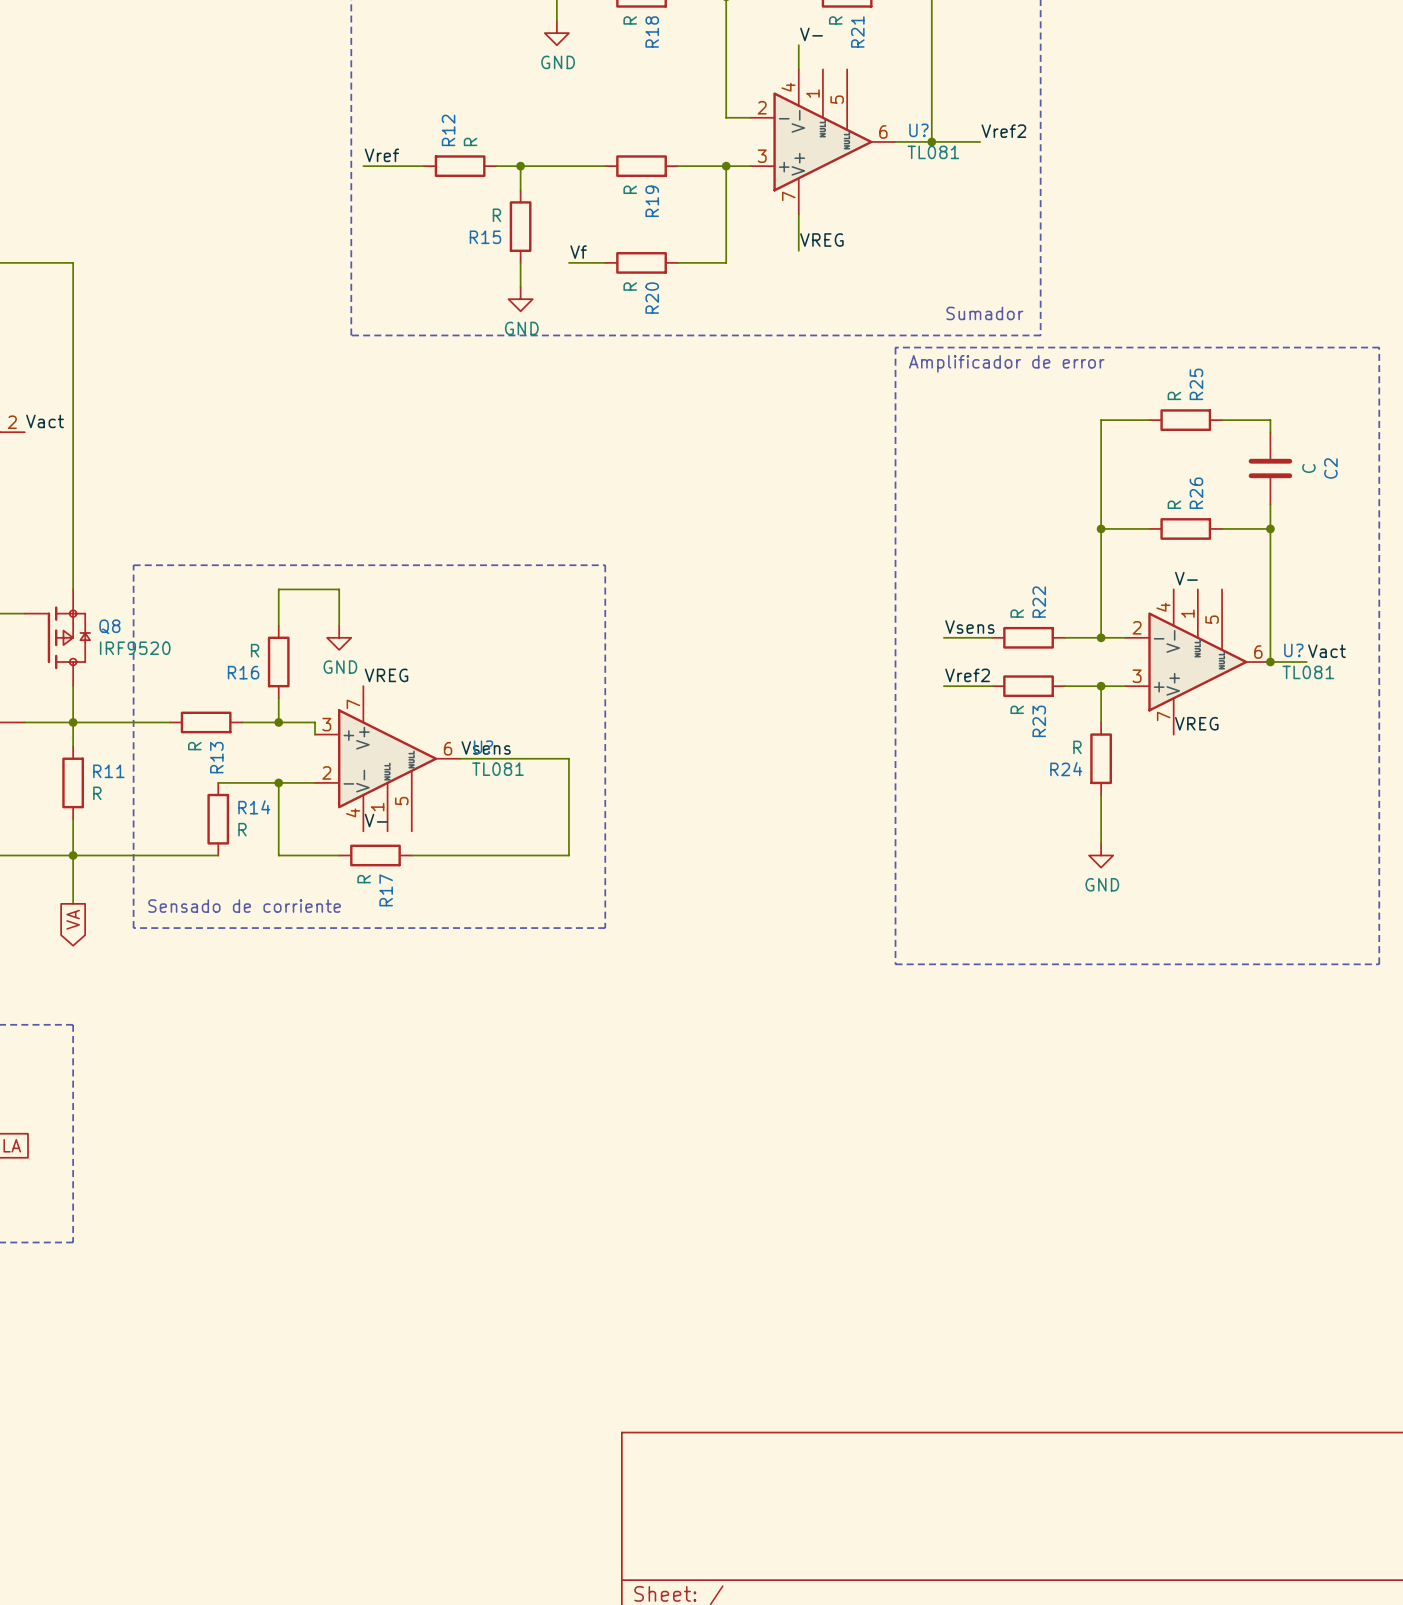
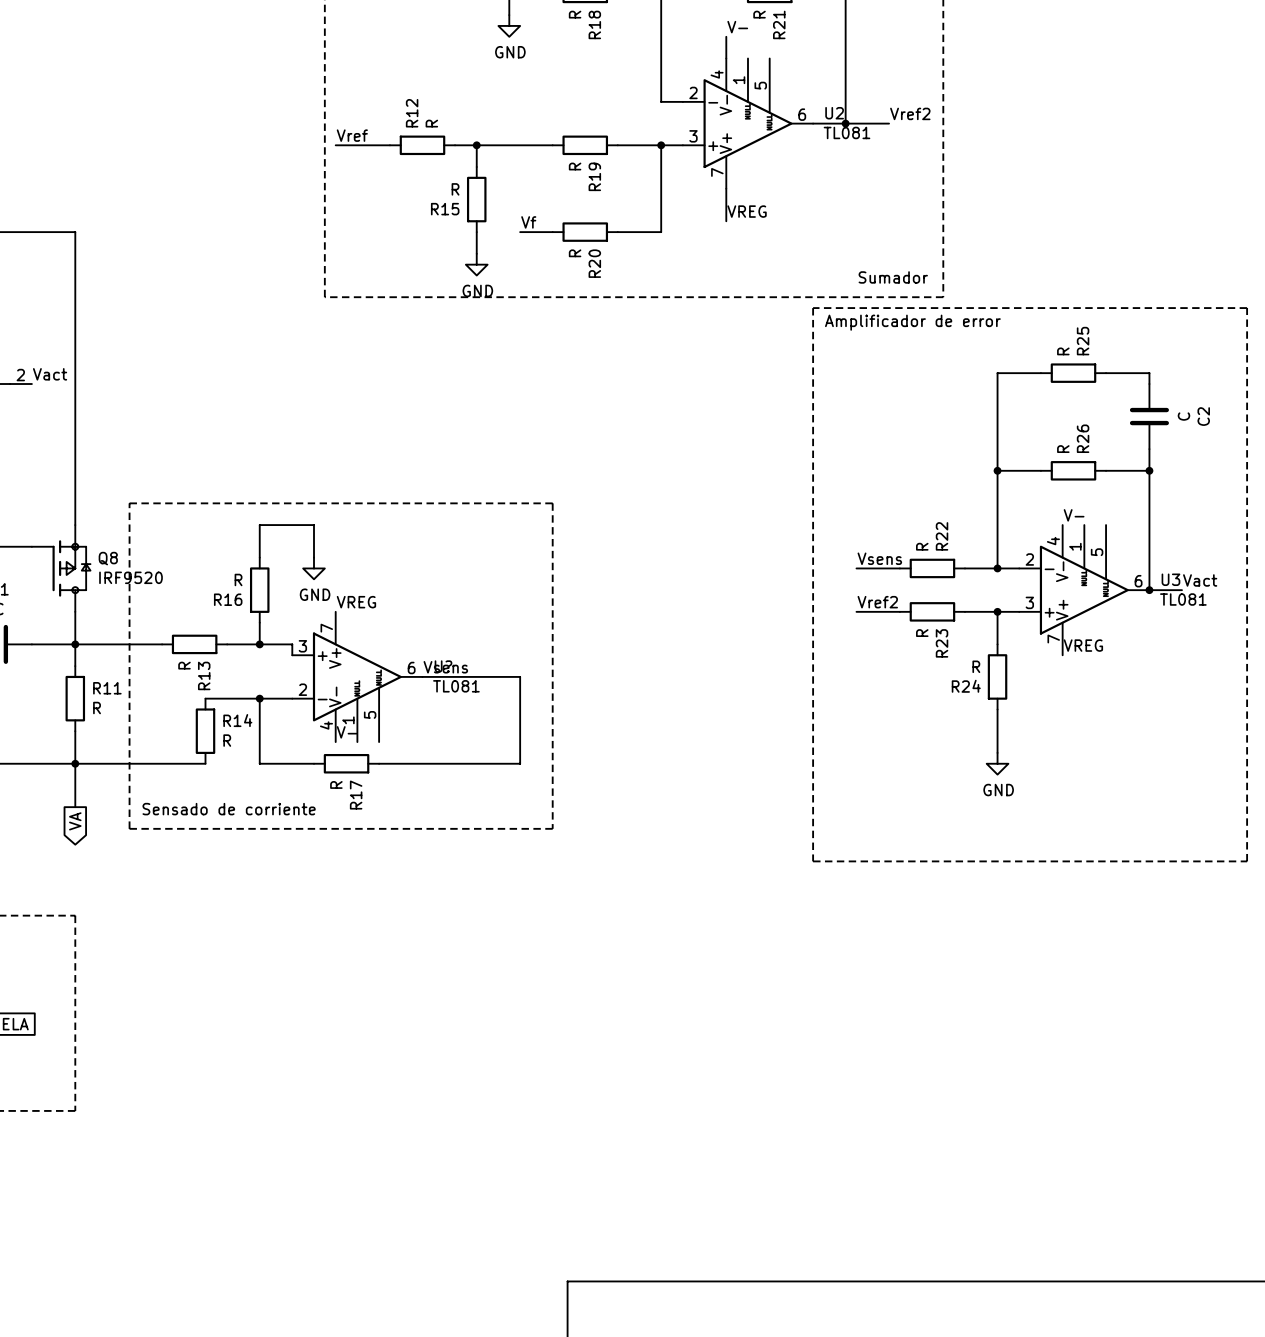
U? name: U? (918, 130) -> U2 (834, 113)
U? name: U? (1293, 650) -> U3 (1170, 579)

